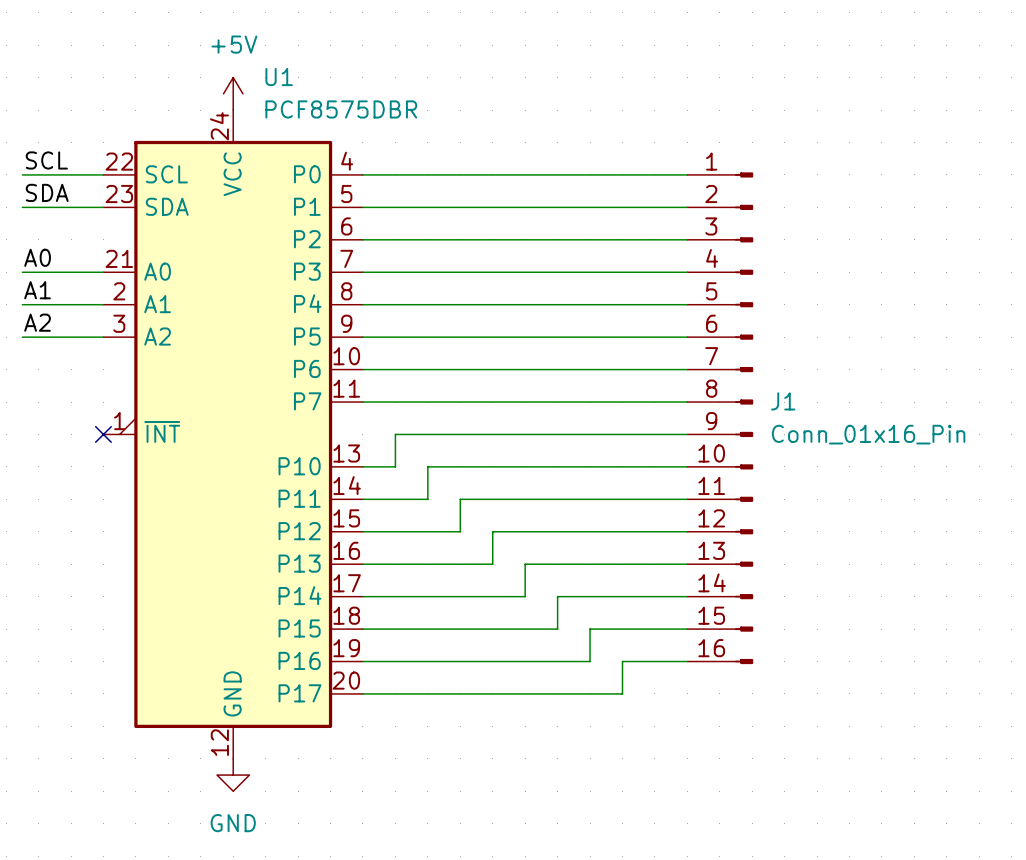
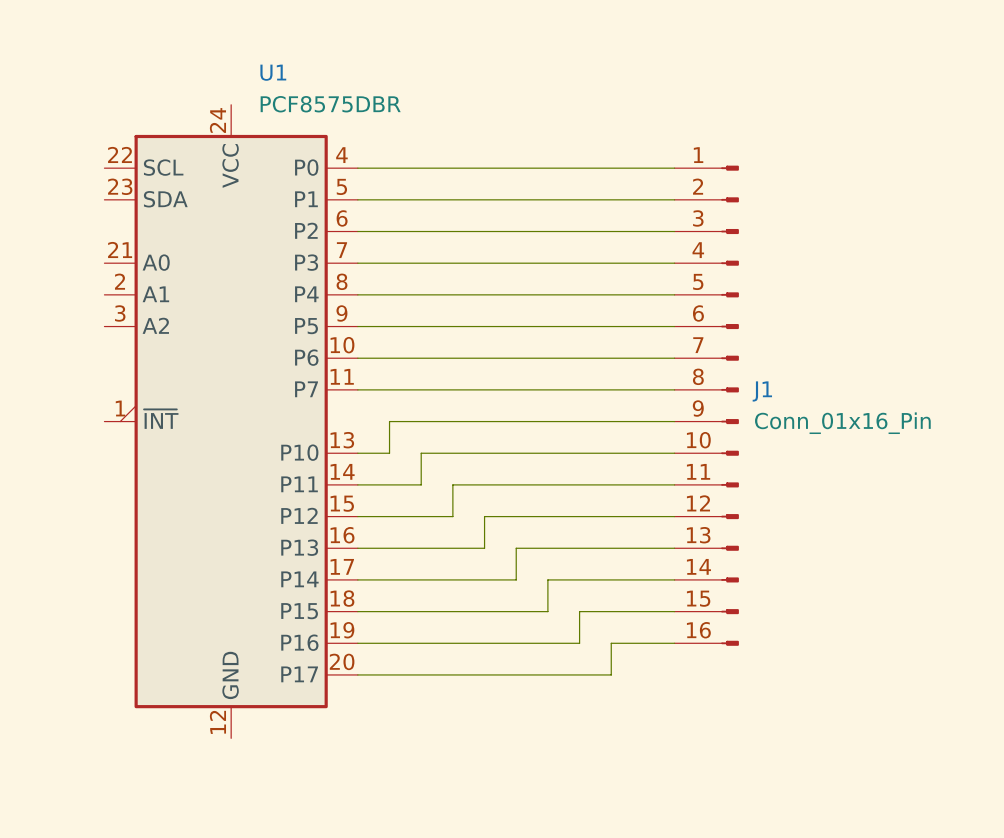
power symbol: +5V (233, 93) -> none
label: SCL (46, 160) -> none
wire: (22, 174) (103, 174) -> none
label: SDA (47, 192) -> none
wire: (22, 207) (103, 207) -> none
label: A0 (37, 257) -> none
wire: (22, 272) (103, 272) -> none
label: A1 (37, 290) -> none
wire: (22, 304) (103, 304) -> none
label: A2 (37, 322) -> none
wire: (22, 337) (103, 337) -> none
no-connect mark: (103, 434) -> none
power symbol: GND (233, 775) -> none

